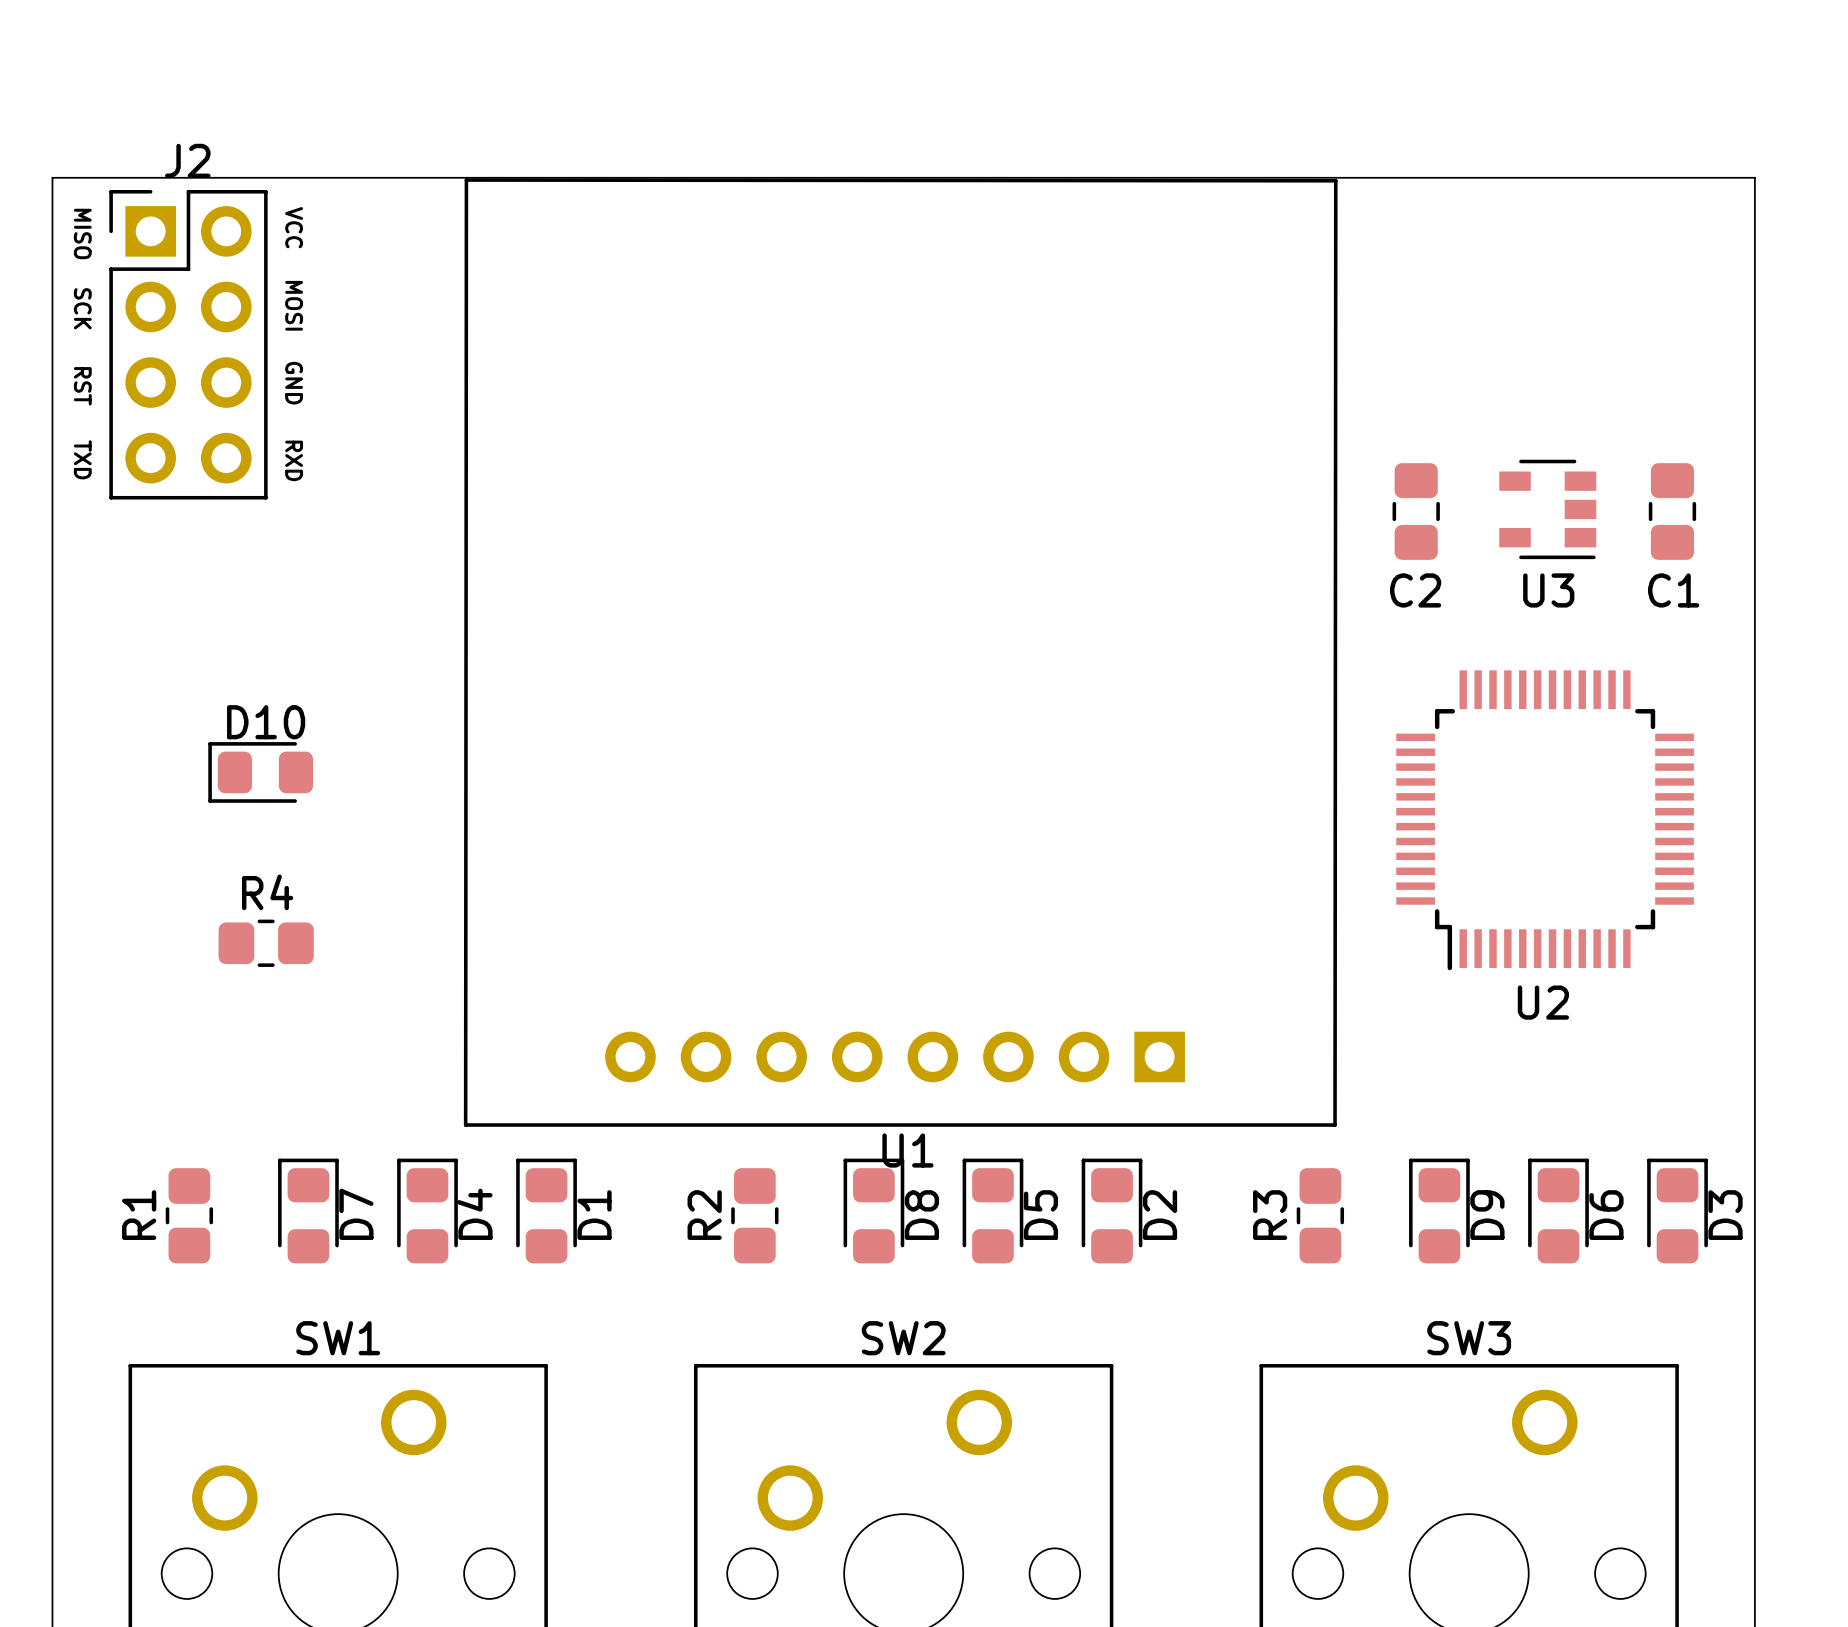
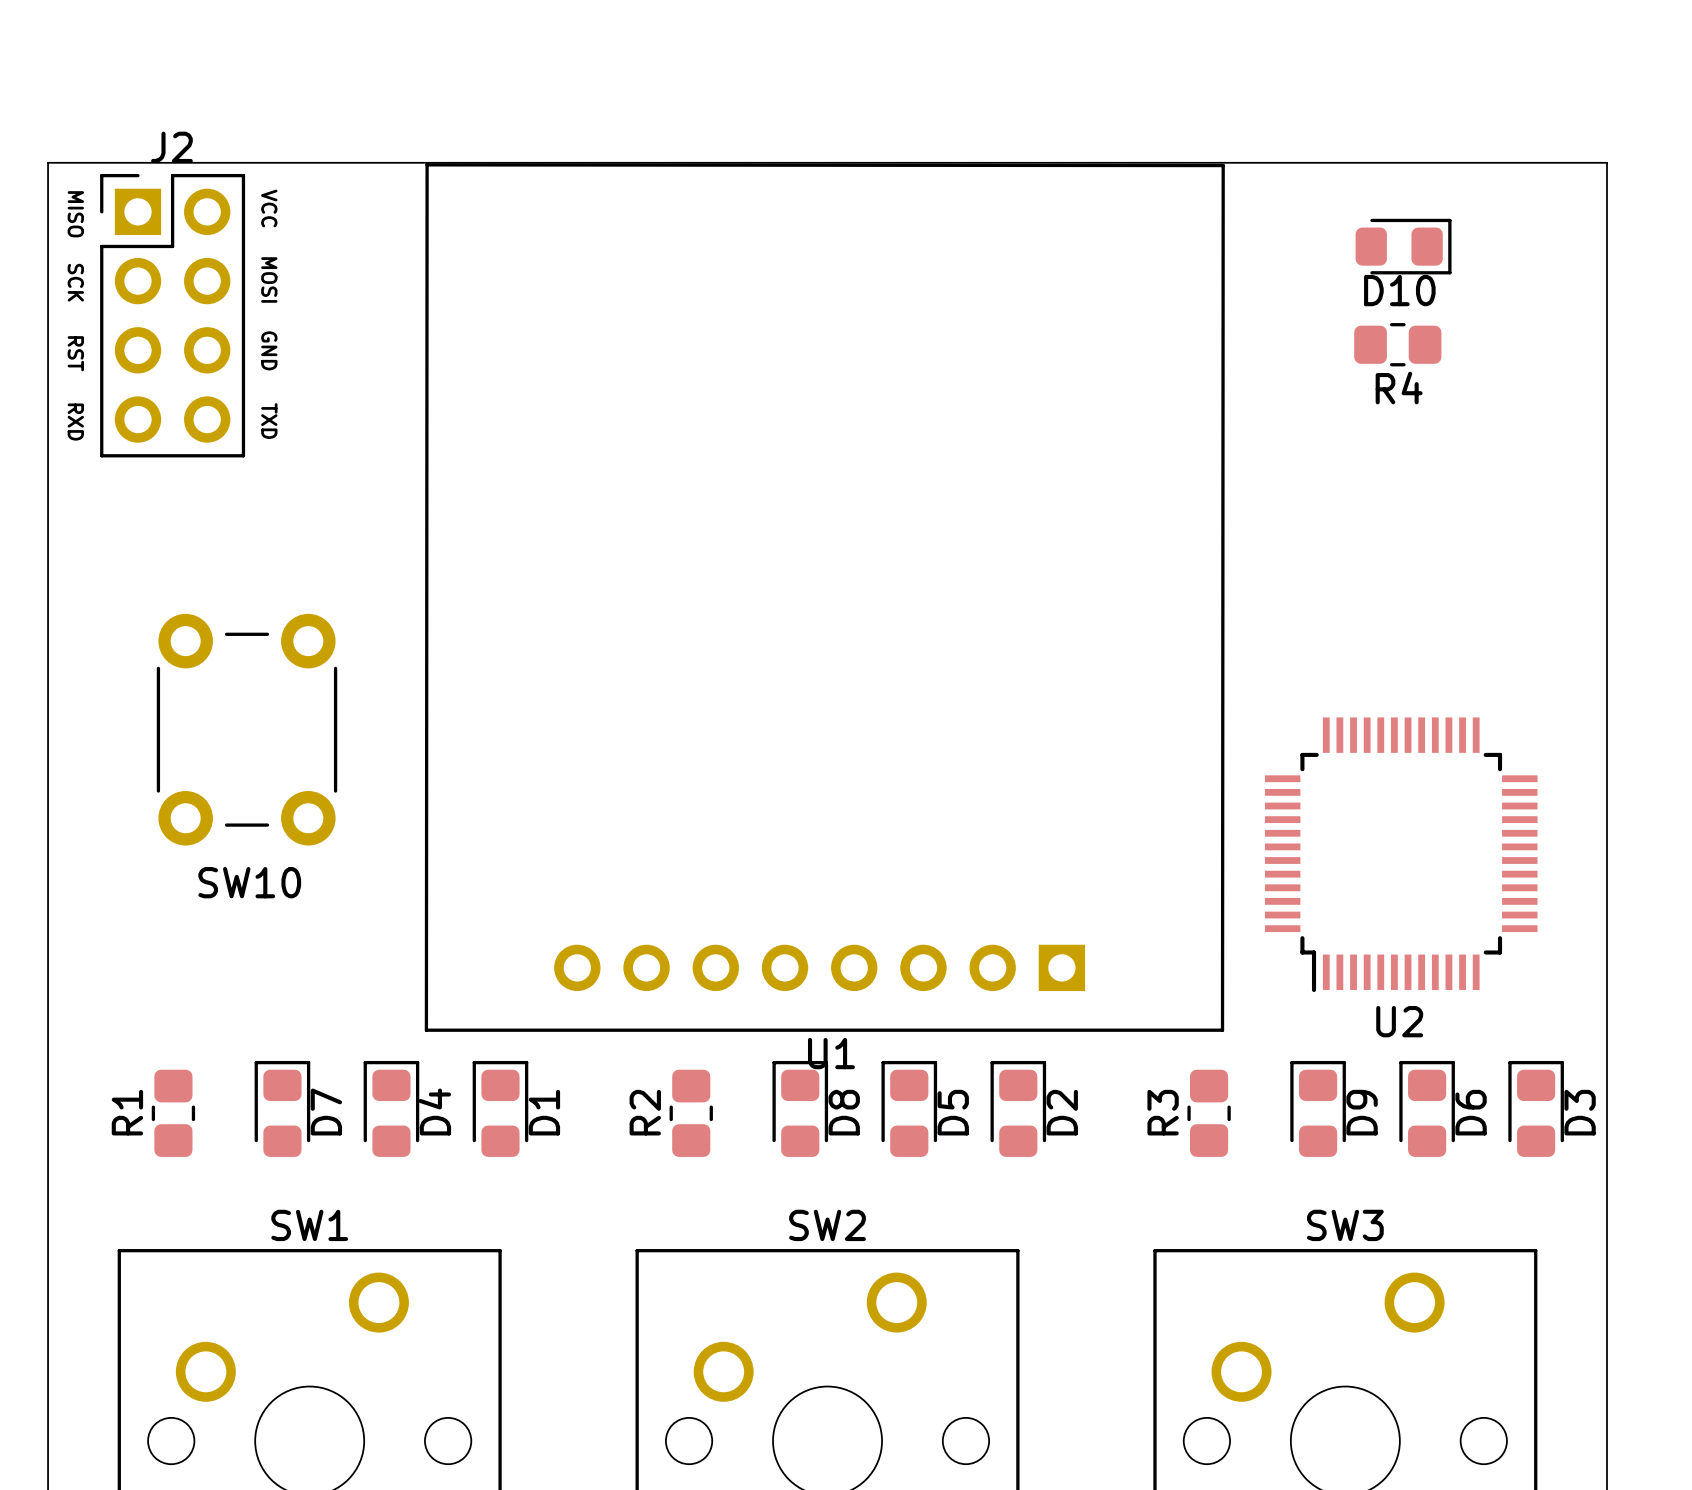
text: TXD (82, 459) -> RXD (75, 422)
text: RXD (294, 460) -> TXD (269, 421)
U3: (1547, 509) -> none
C2: (1416, 511) -> none
C1: (1672, 511) -> none
D10 rotation: 0° (260, 772) -> 180° (1403, 246)
D10 position: (260, 772) -> (1403, 246)
SW10: none -> (247, 729)
U2 position: (1545, 820) -> (1401, 854)
R4 name position: R4 (267, 892) -> R4 (1399, 388)
R4 position: (266, 943) -> (1397, 344)

